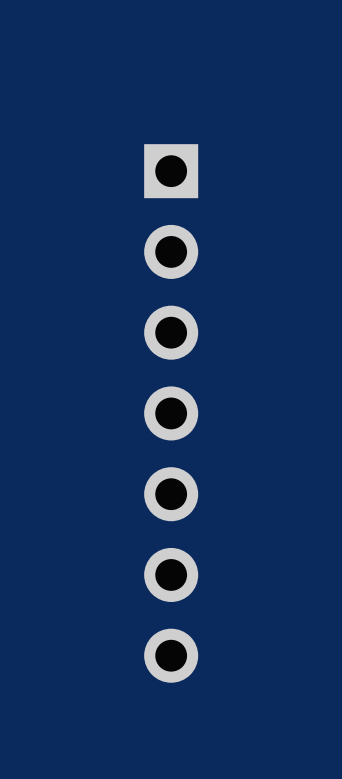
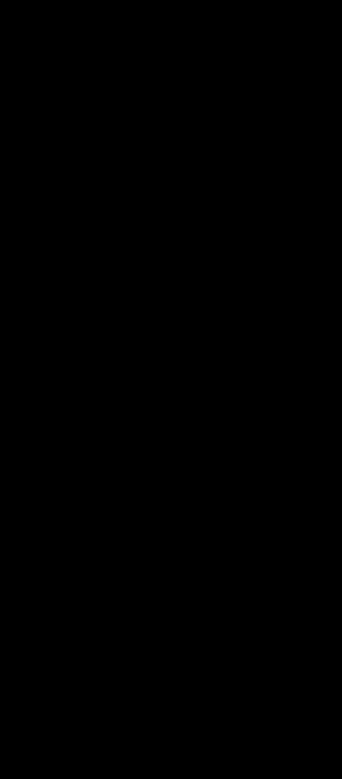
part: (171, 413) -> none

